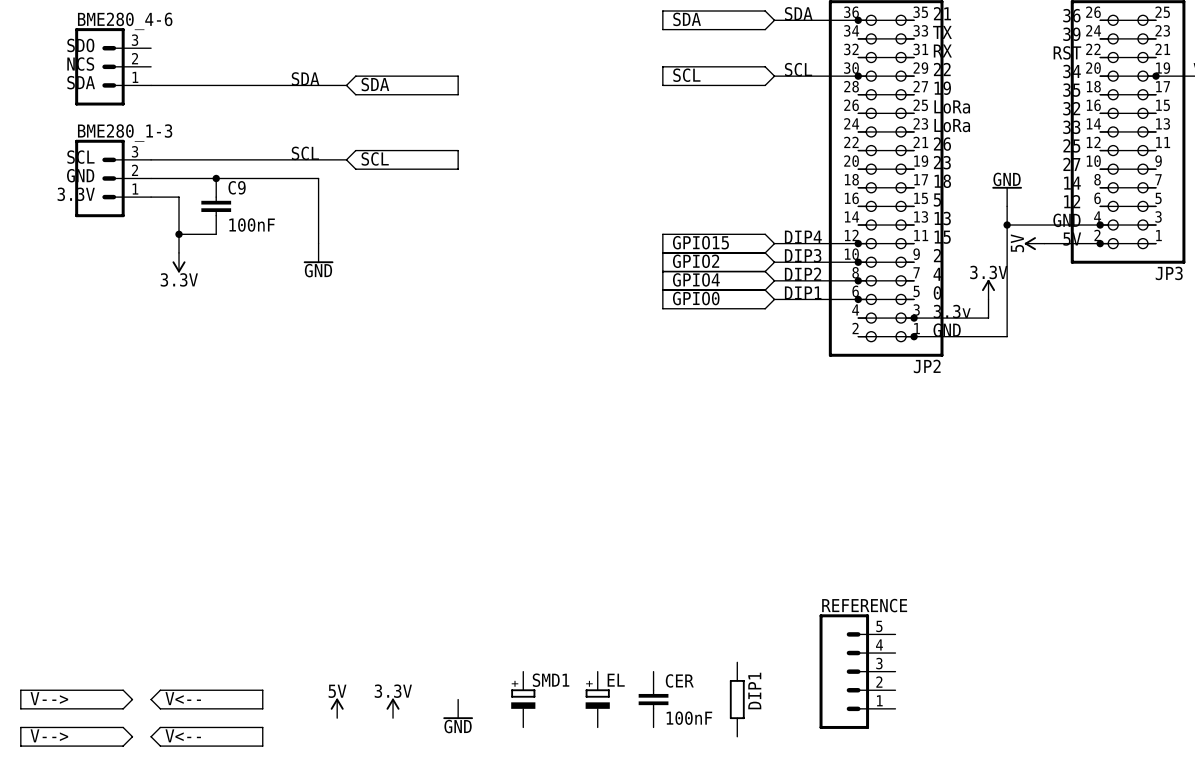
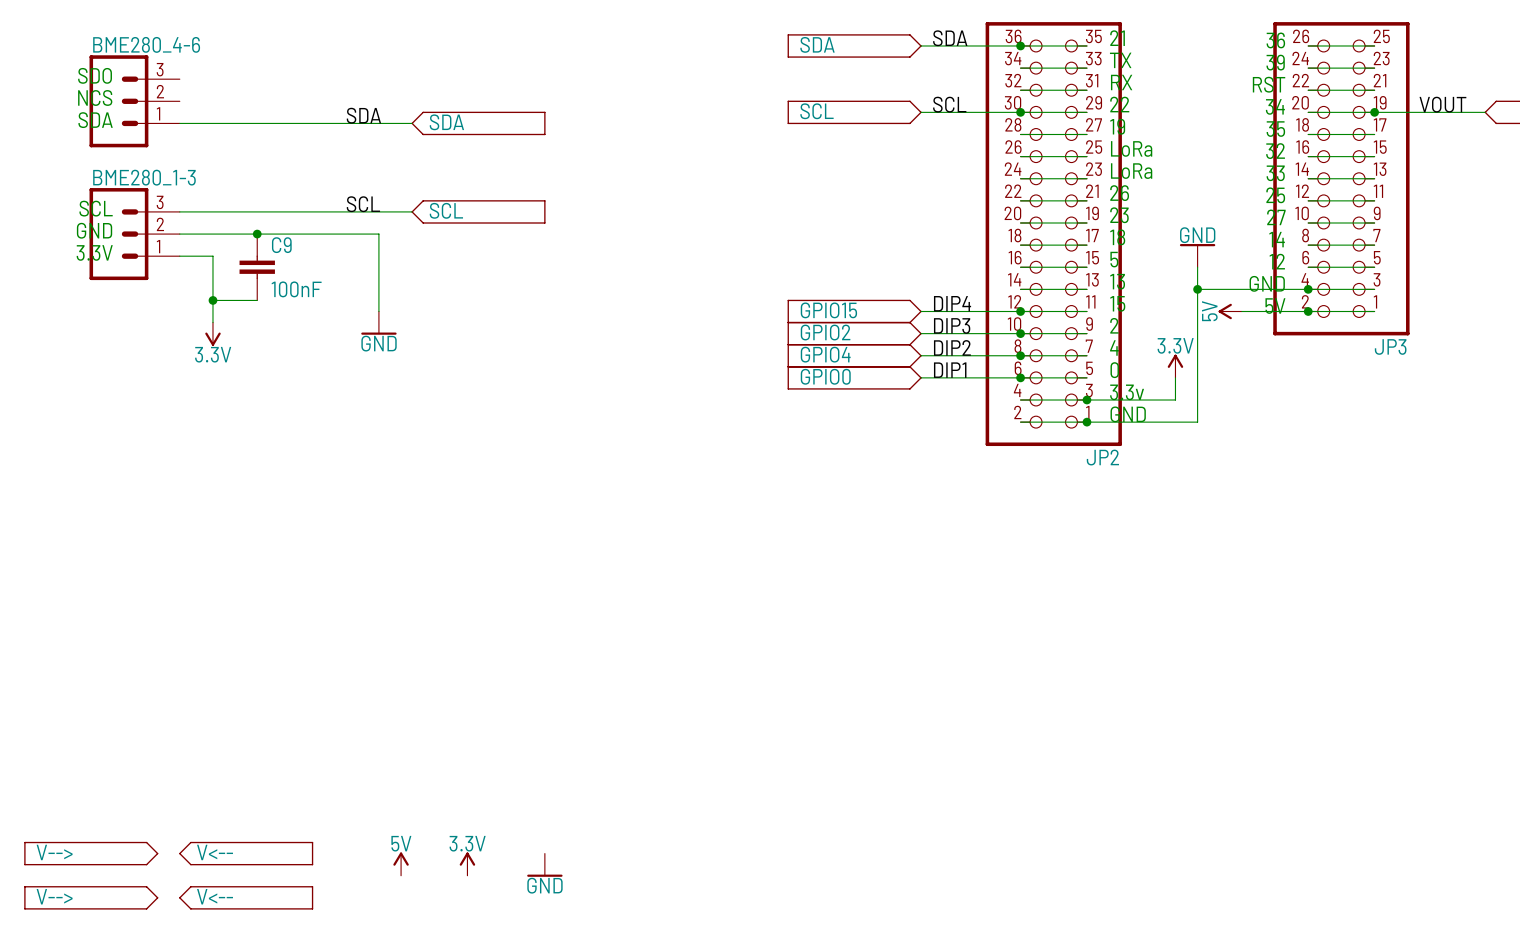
REFERENCE: (857, 671) -> none
SMD1: (523, 699) -> none
EL: (597, 699) -> none
CER: 100nF (653, 699) -> none
DIP1: (737, 699) -> none

